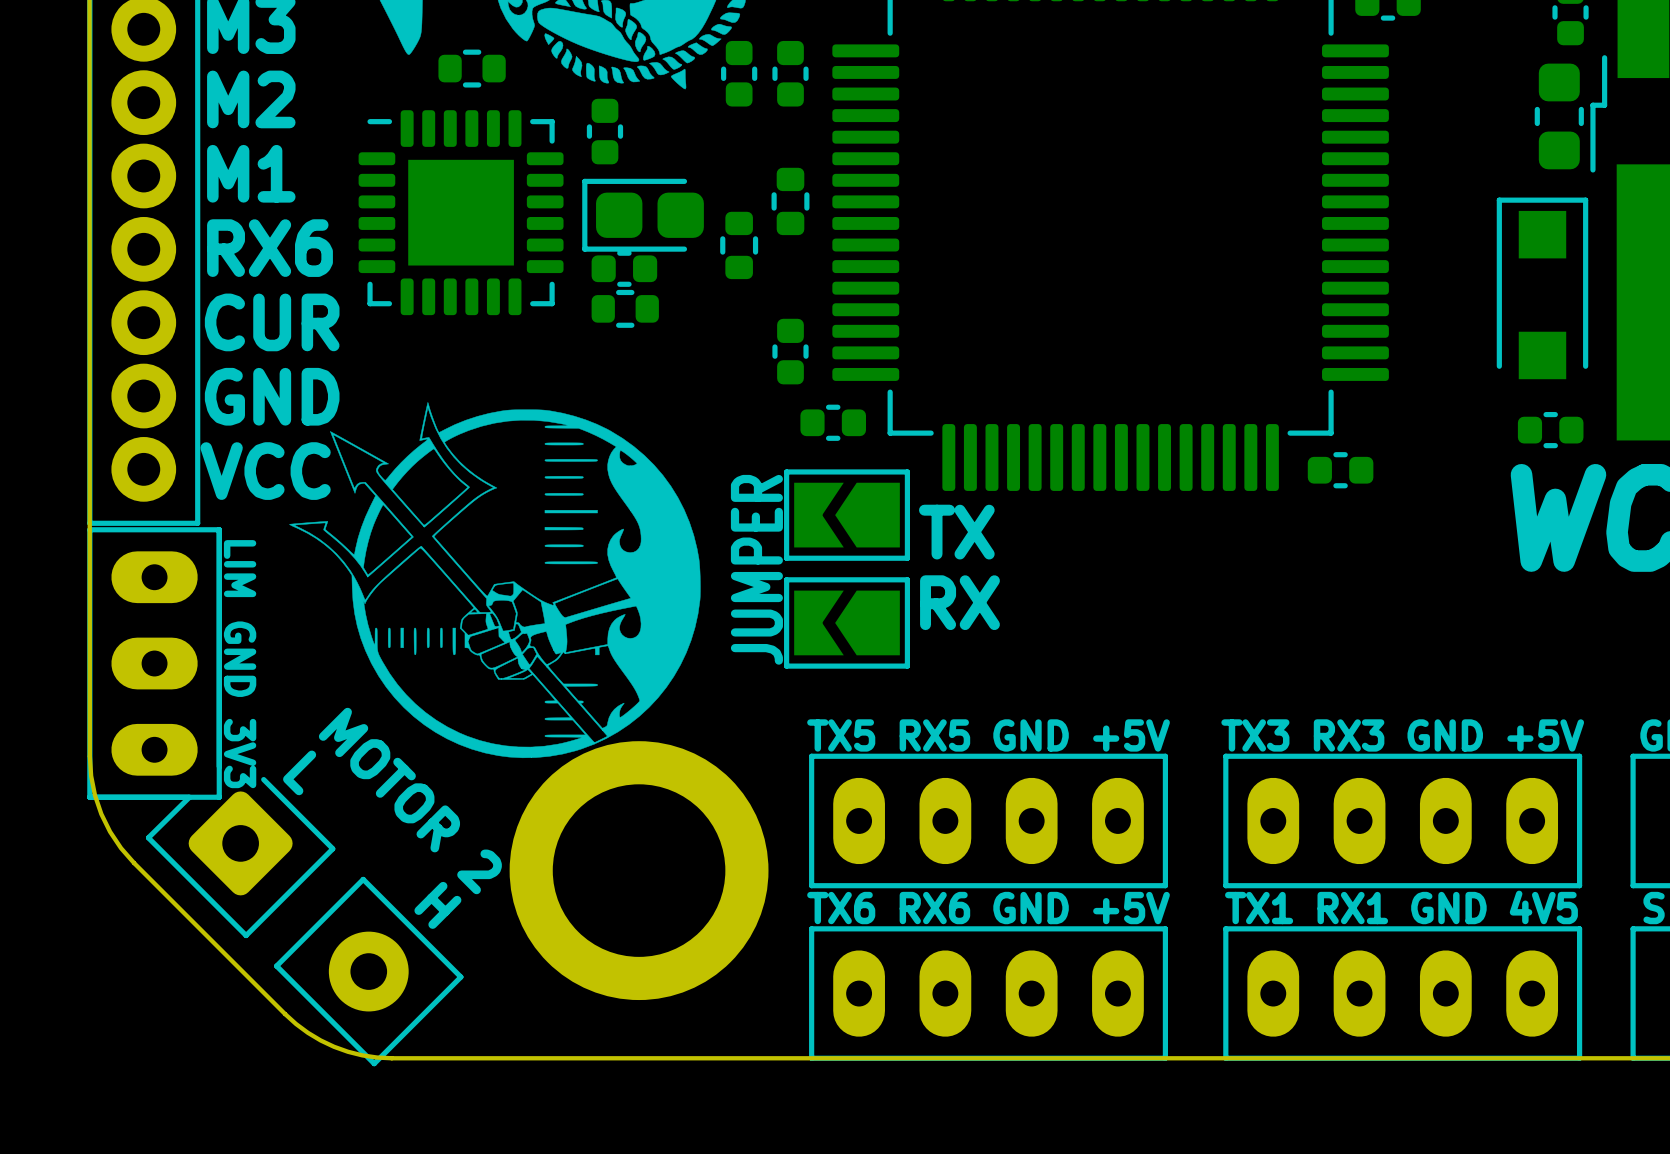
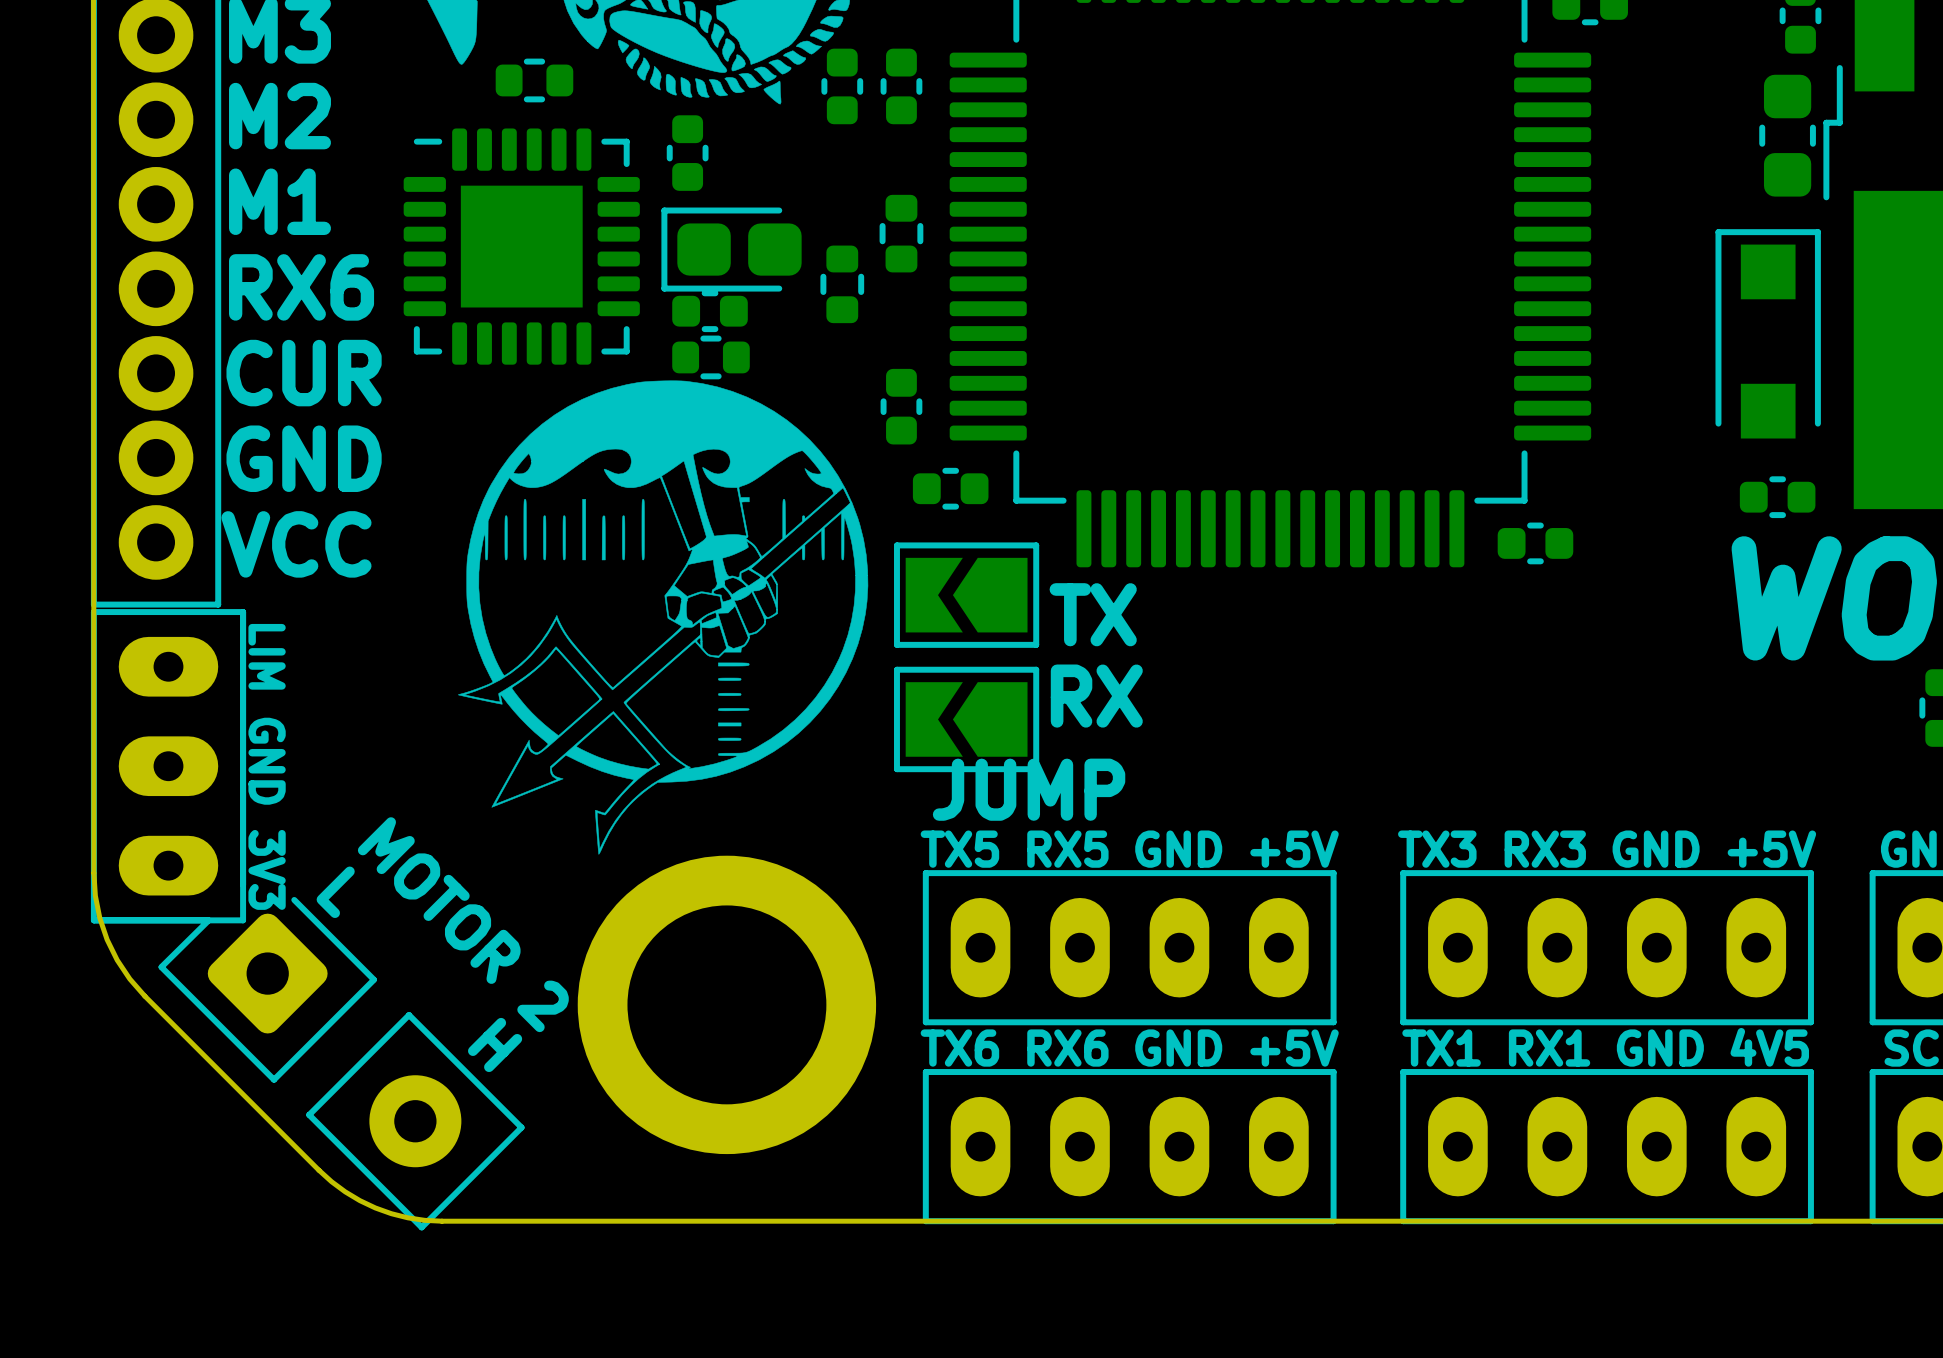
drawing: none -> [458, 380, 869, 855]
drawing: [289, 402, 701, 759] -> none
text: JUMPER (756, 569) -> JUMP (1029, 789)

